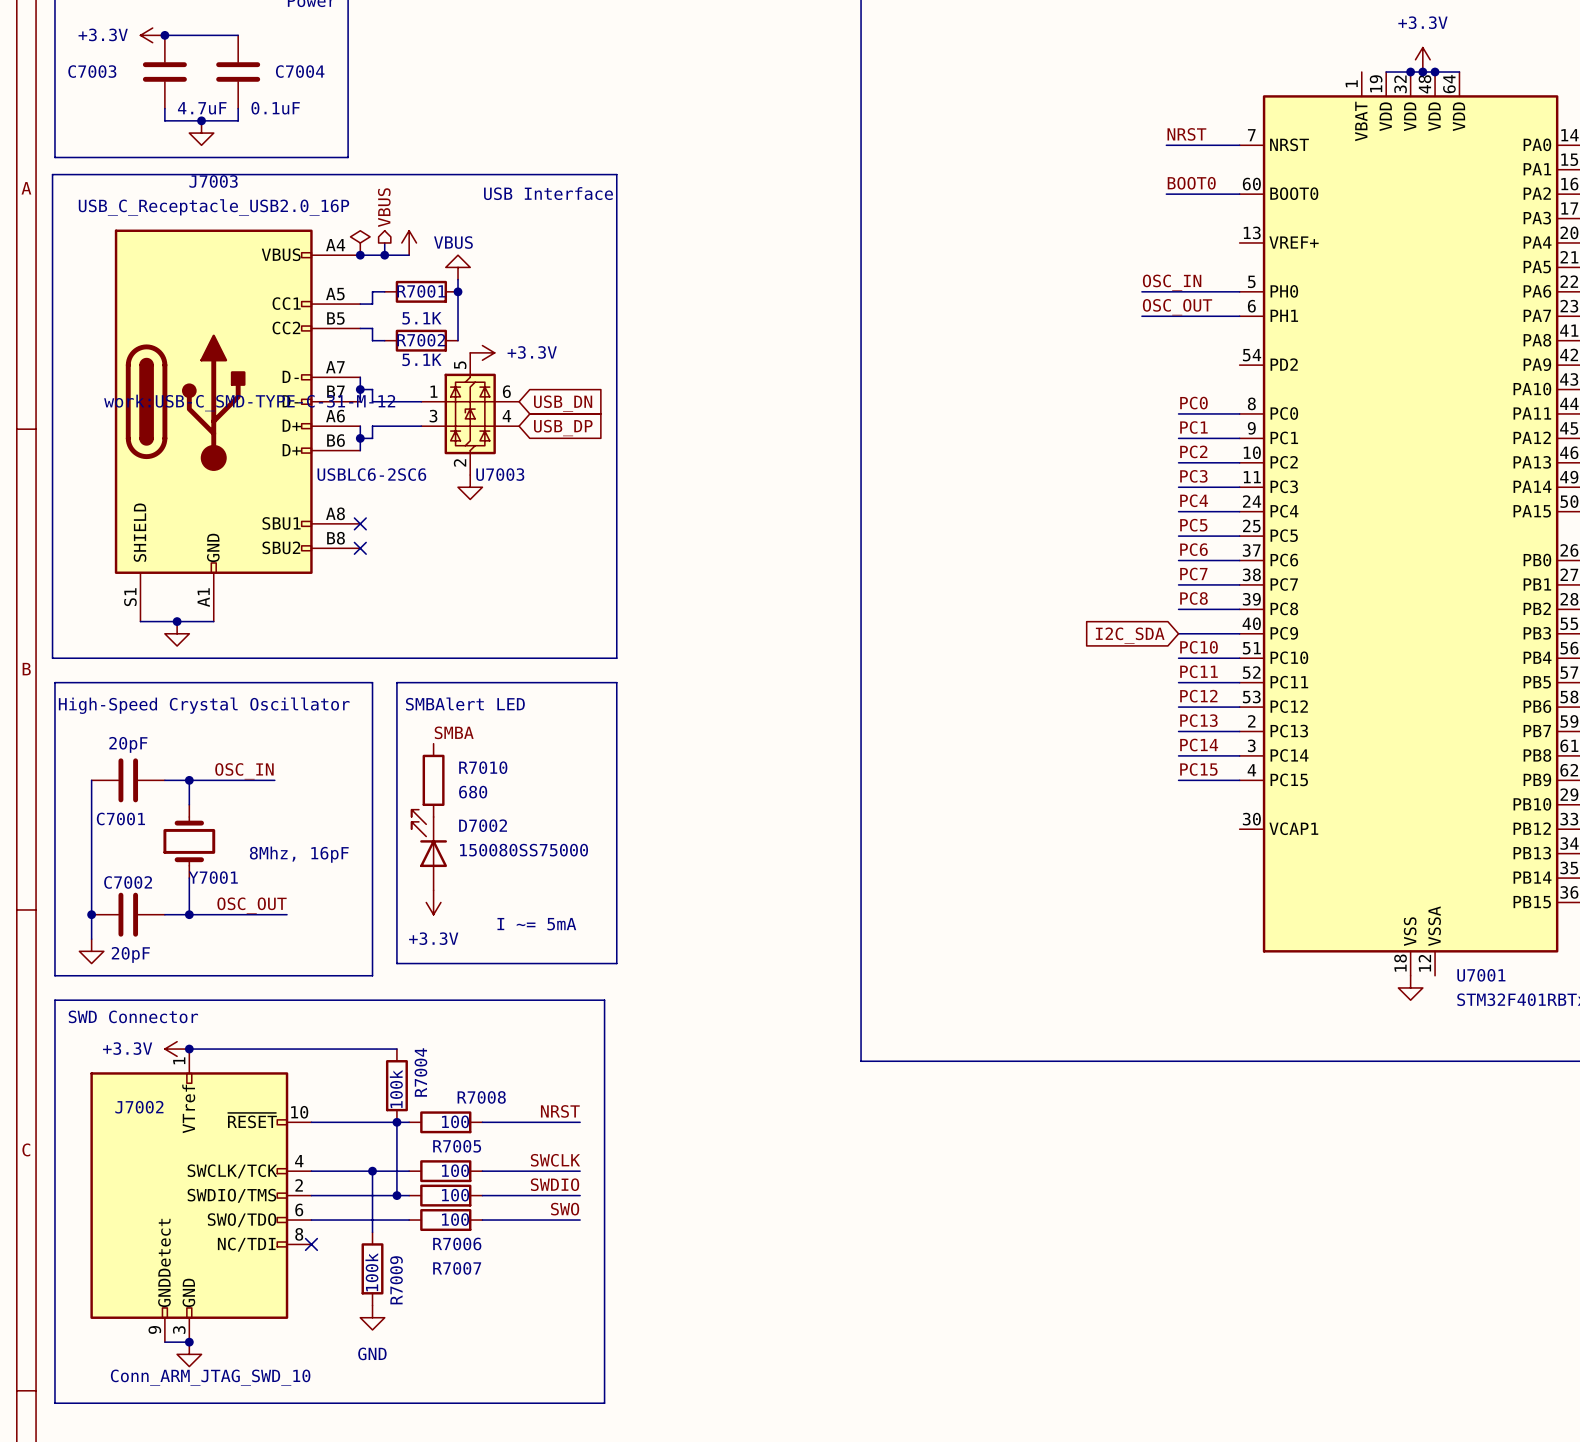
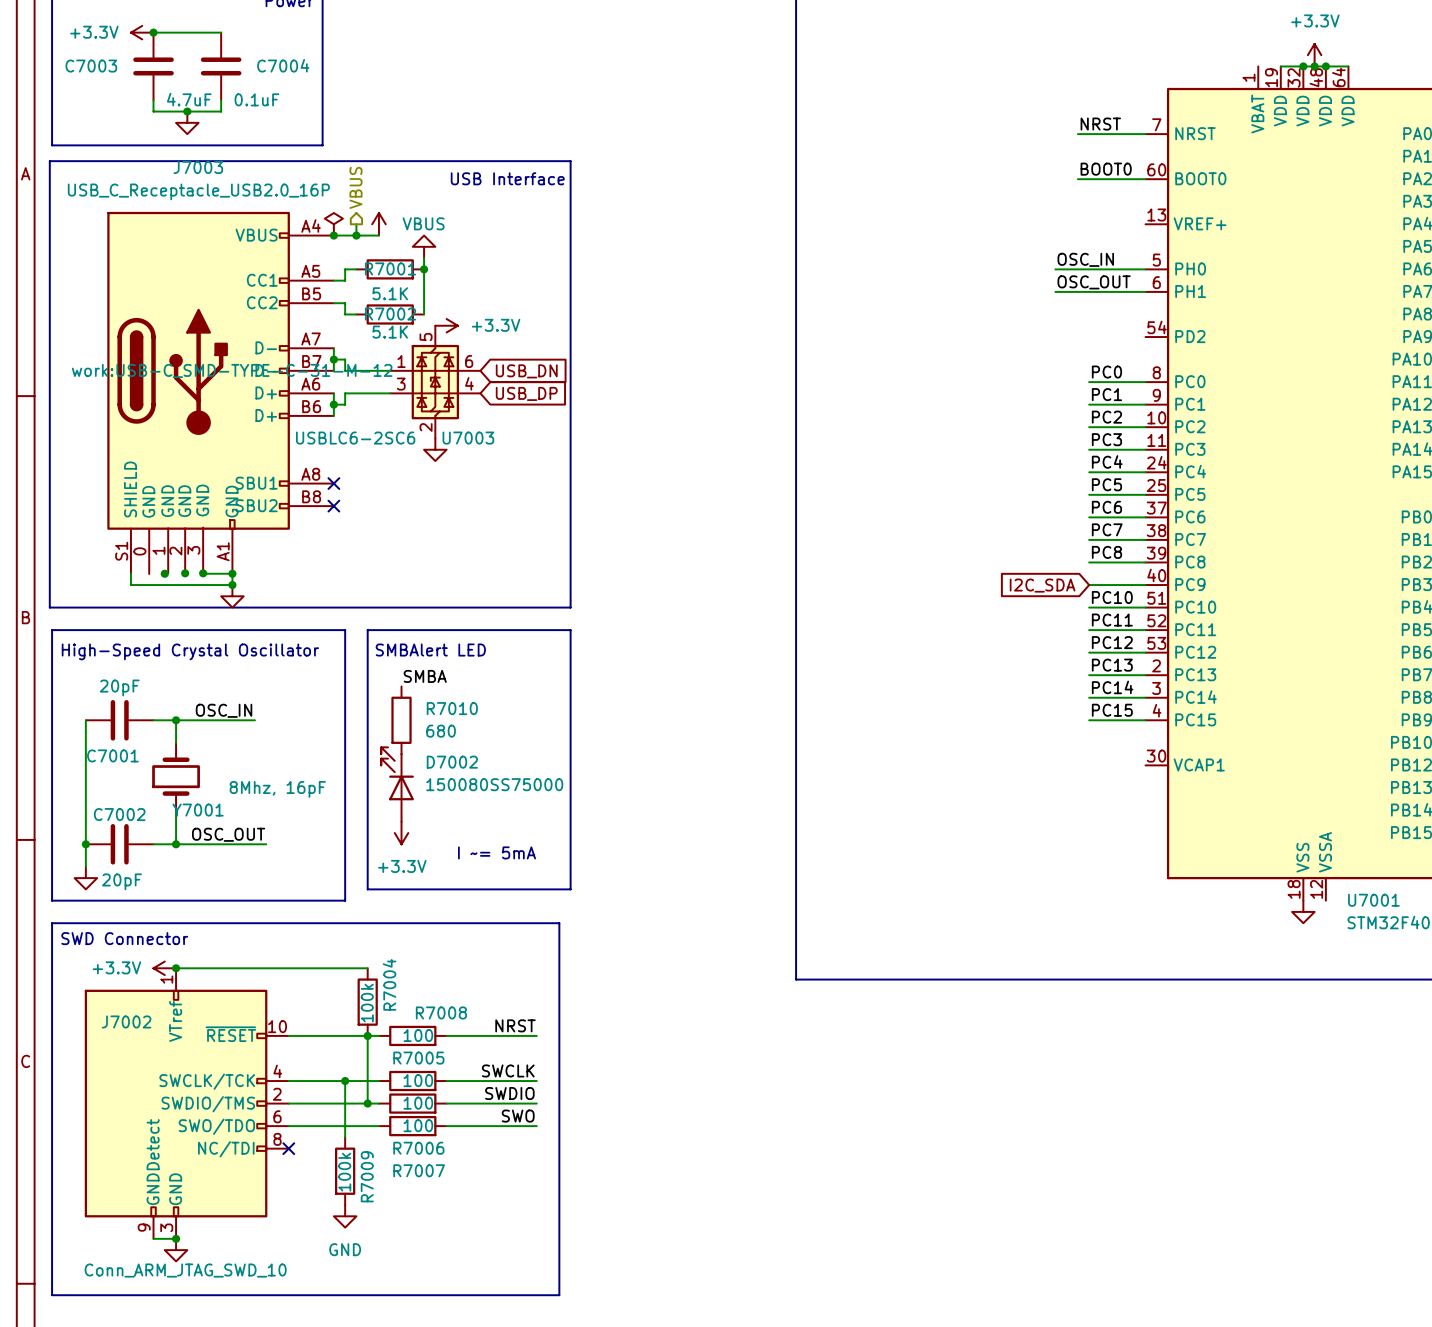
J7003 symbol: [114, 229, 361, 622] -> [107, 211, 334, 574]
wire: (140, 621) (213, 621) -> (130, 573) (130, 585) (232, 585) (232, 573) (203, 572)
junction: none -> (185, 573)
junction: none -> (203, 573)
junction: none -> (232, 573)
power symbol position: (177, 633) -> (232, 596)
junction: none -> (232, 585)

